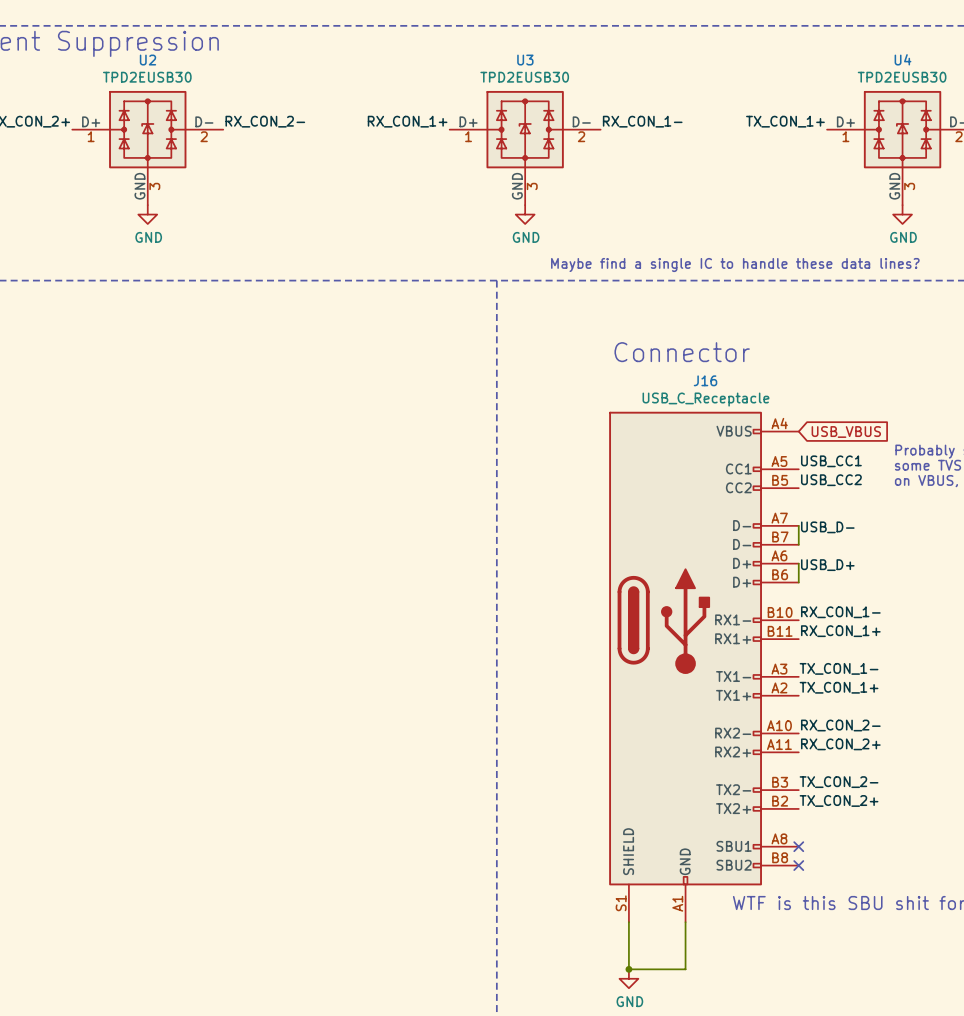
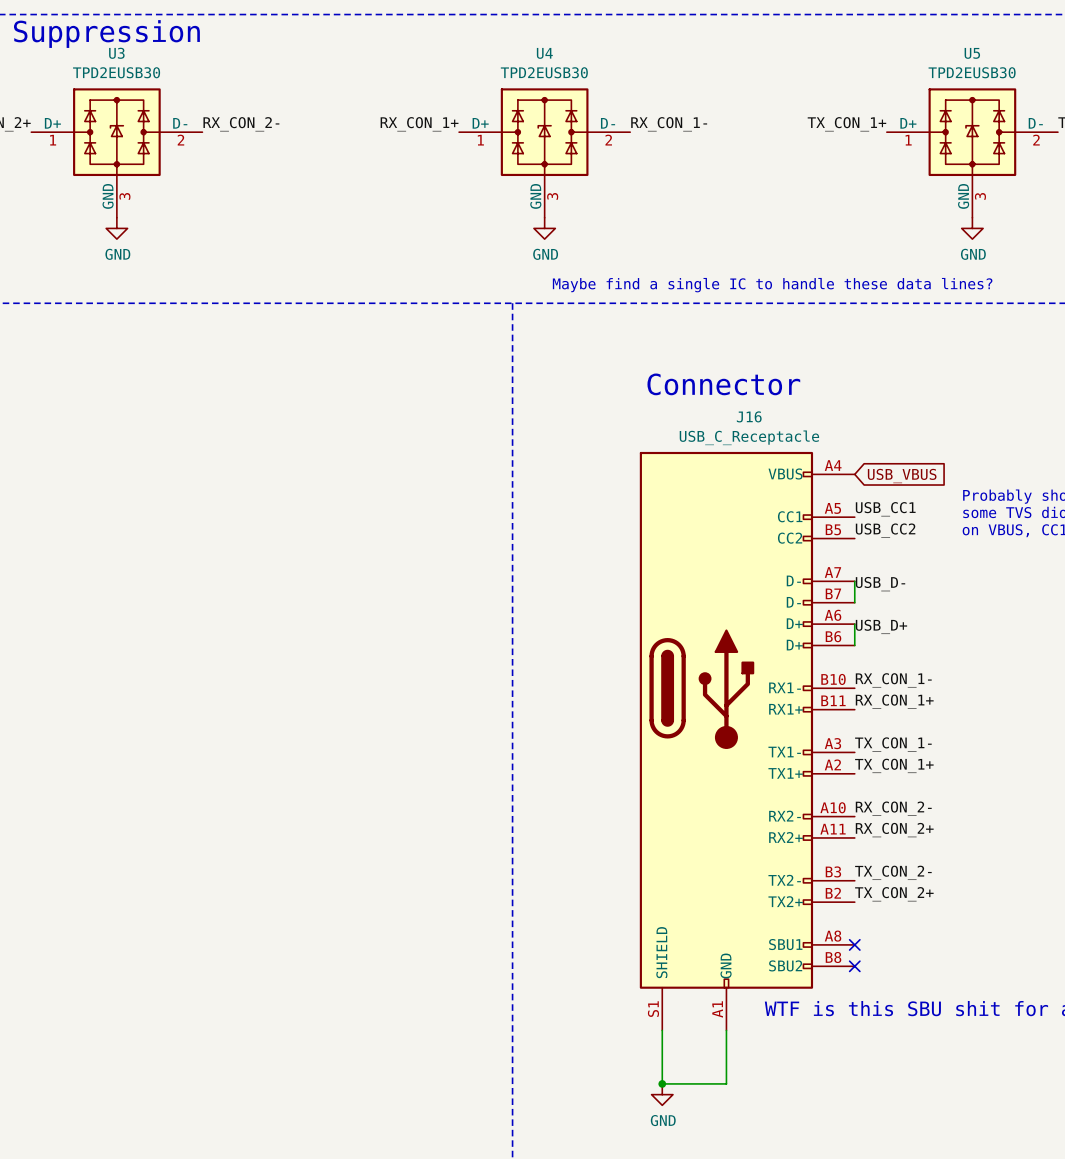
U4 name: U4 (903, 59) -> U5 (972, 53)
U2 name: U2 (147, 60) -> U3 (116, 53)
U3 name: U3 (525, 60) -> U4 (544, 53)

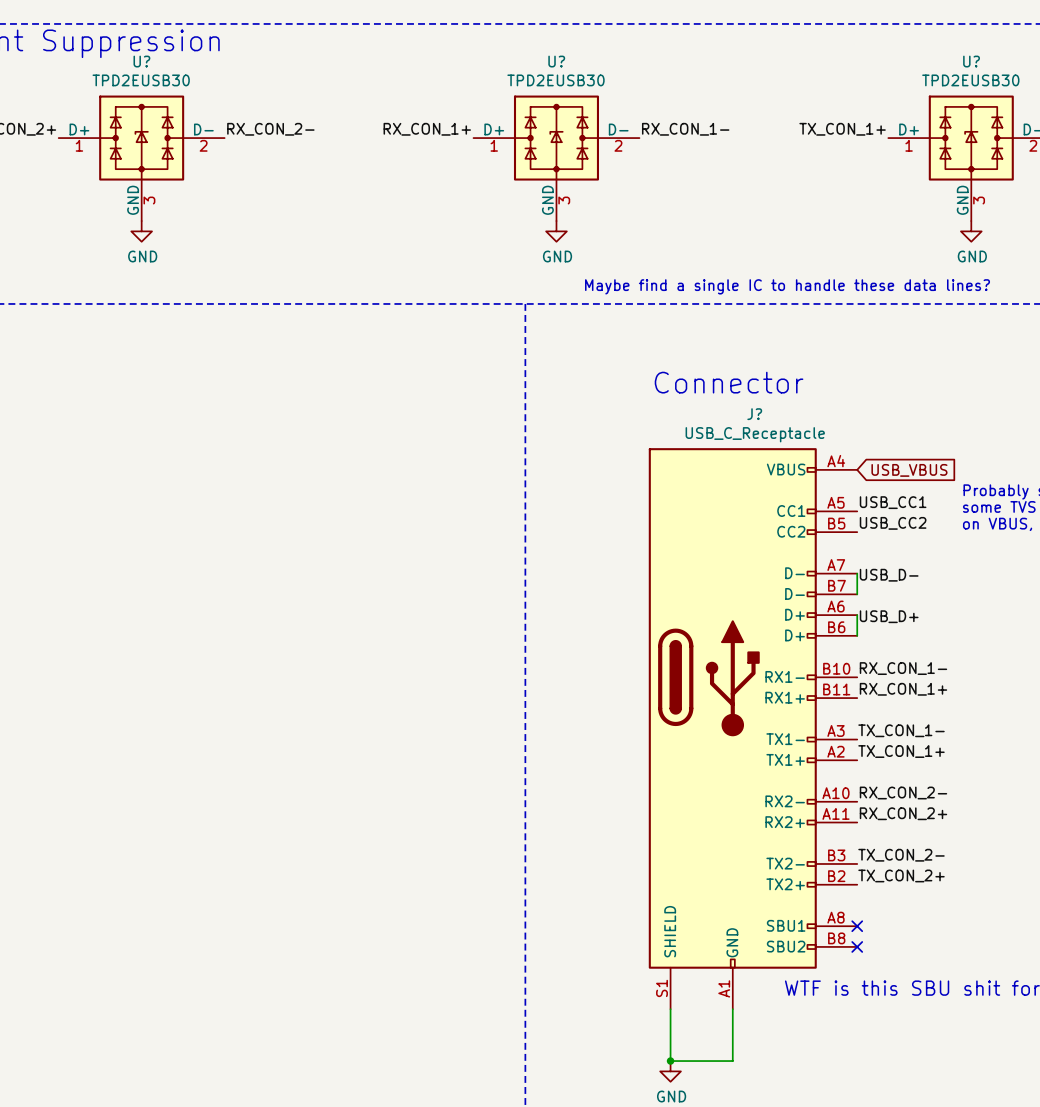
U3 name: U3 (116, 53) -> U? (141, 61)
U4 name: U4 (544, 53) -> U? (556, 61)
U5 name: U5 (972, 53) -> U? (971, 61)
J16 name: J16 (749, 416) -> J? (754, 414)

